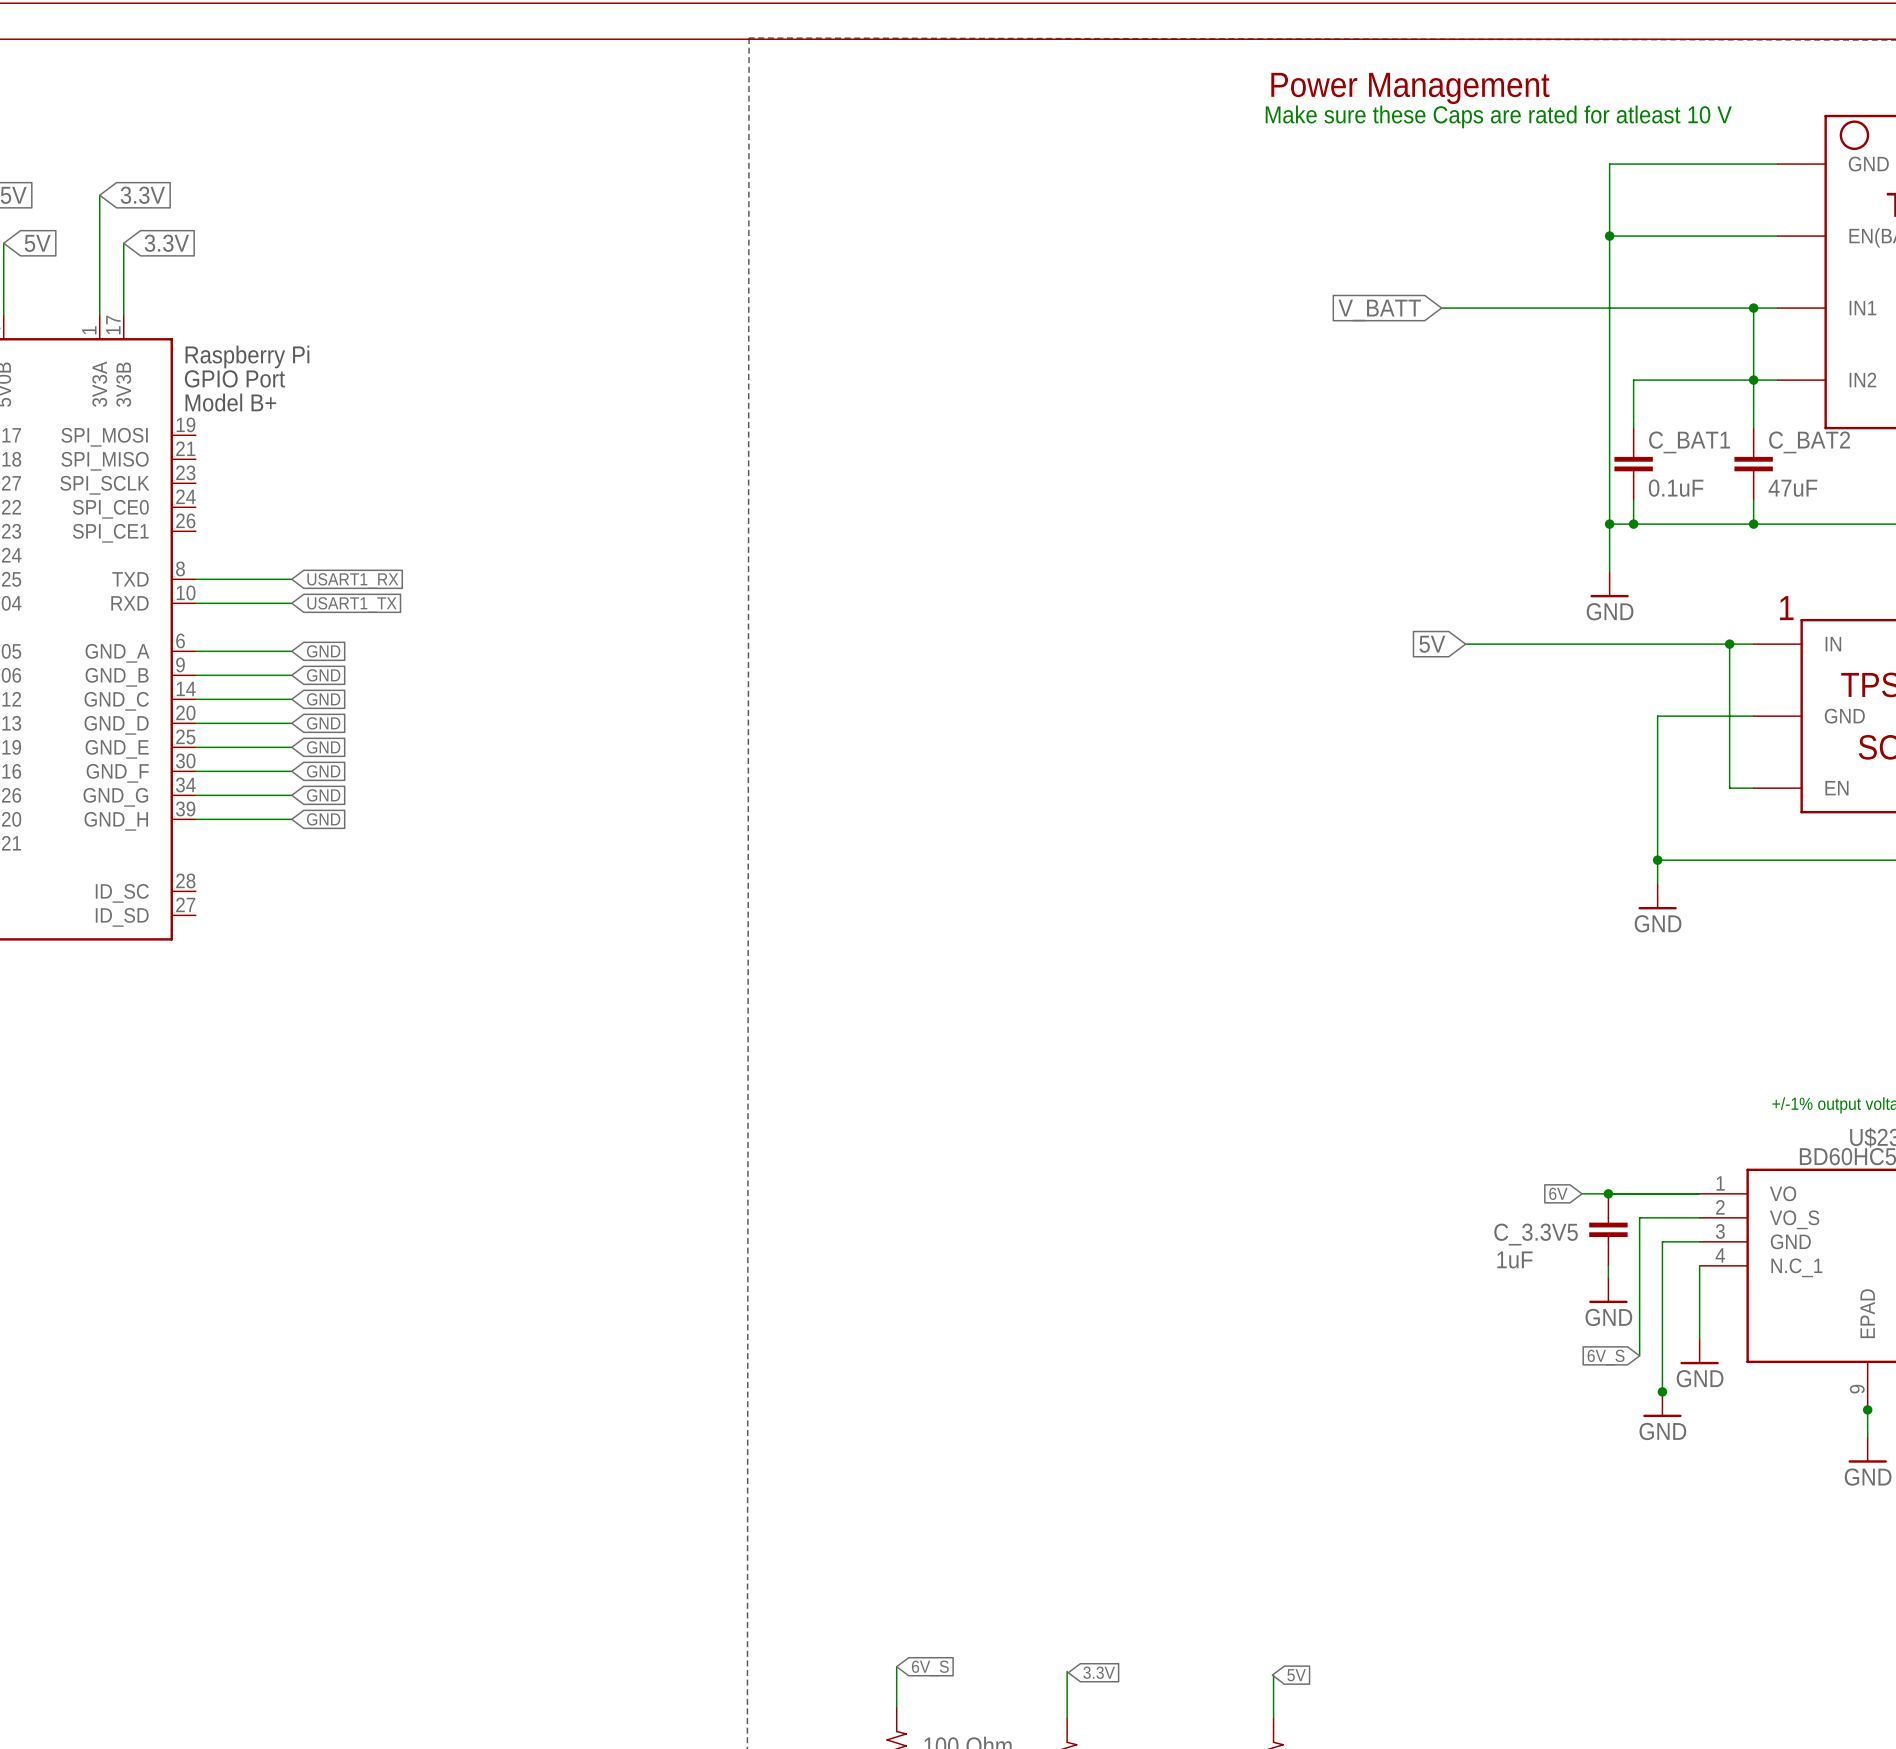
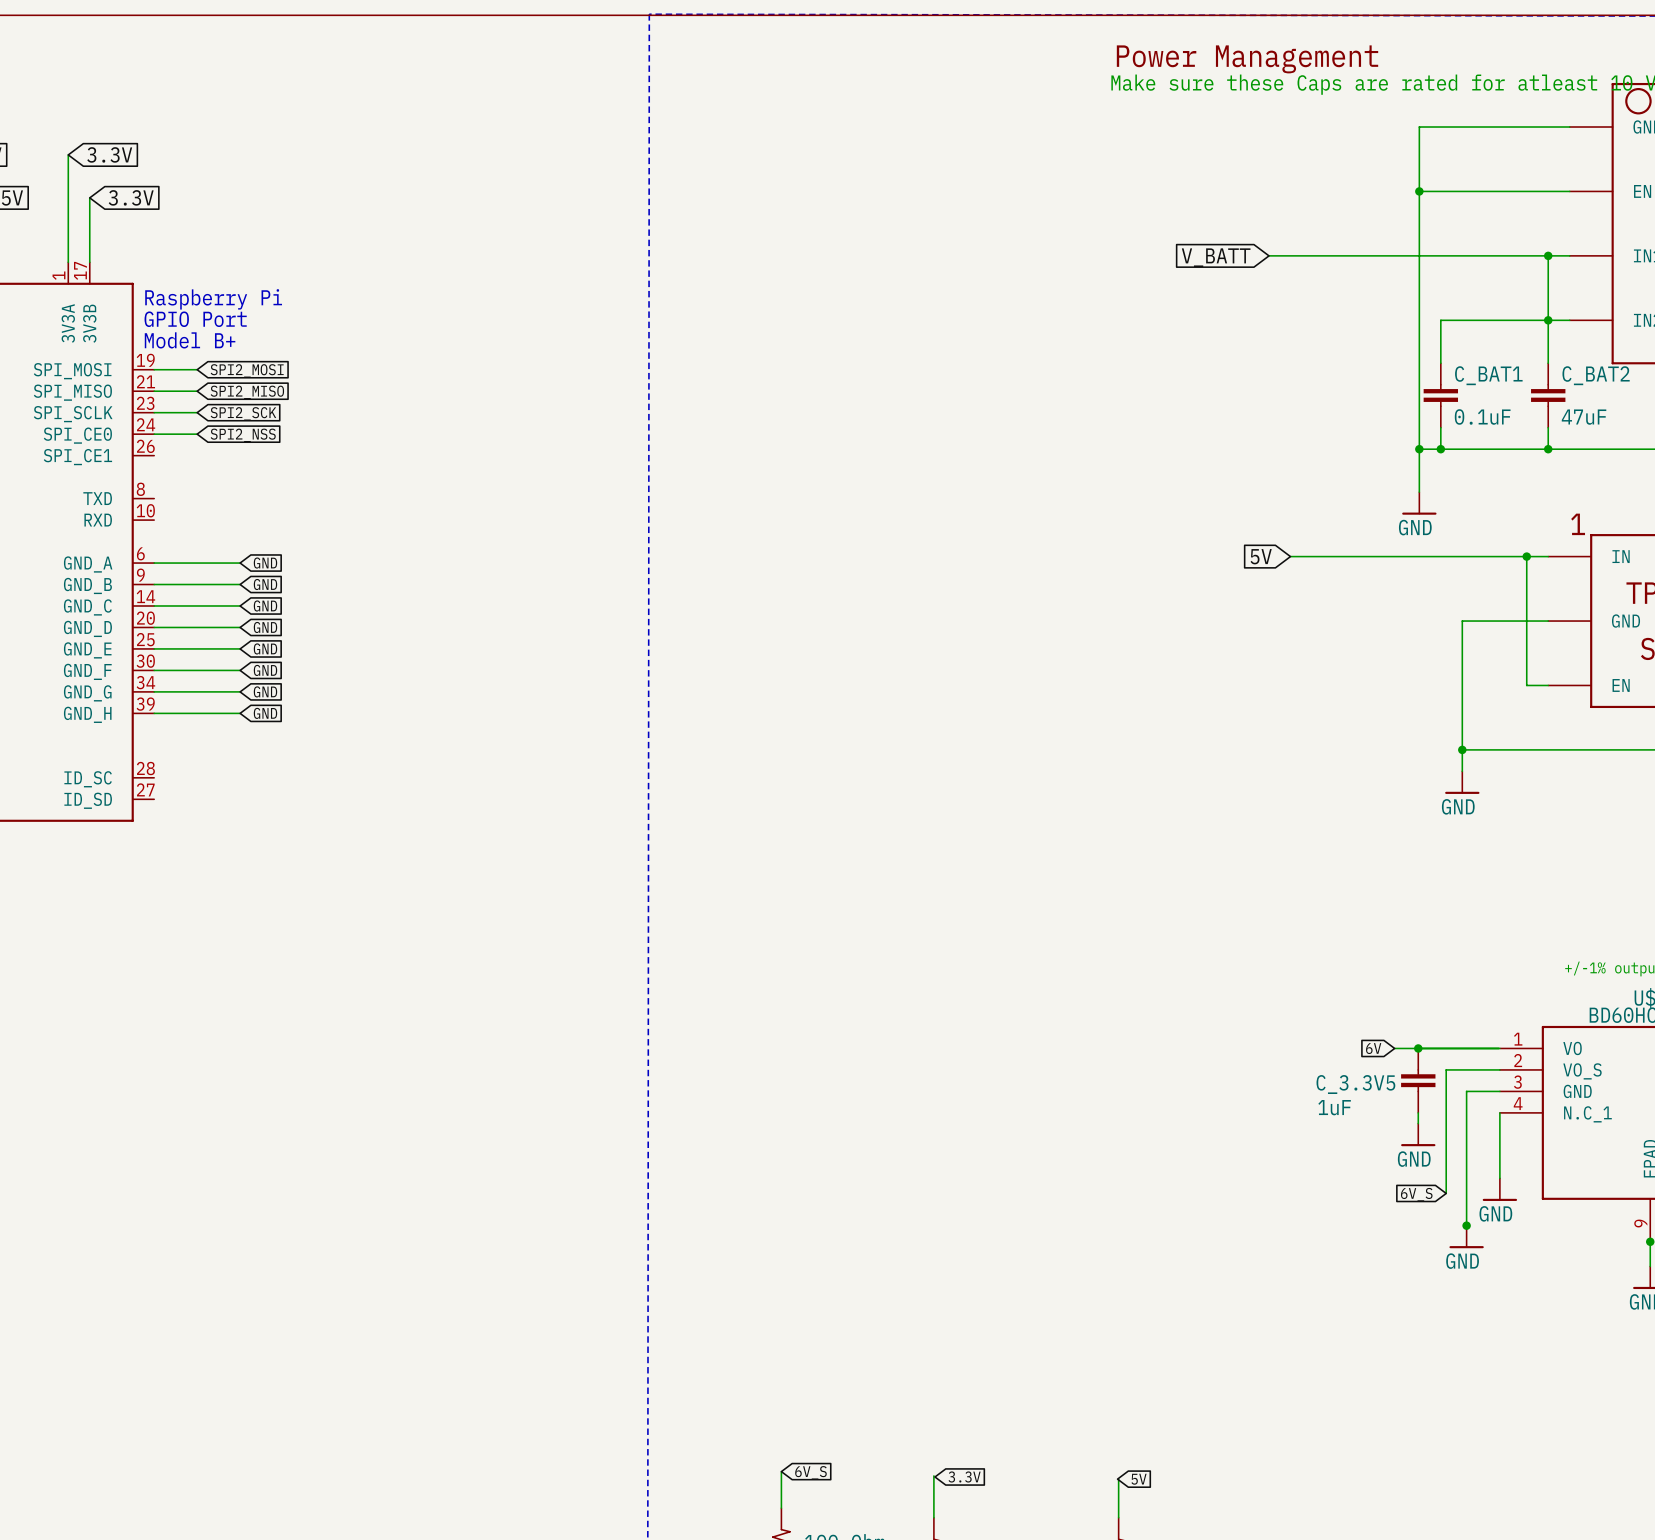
wire: none -> (154, 369) (197, 369)
global label: none -> SPI2_MOSI (247, 370)
wire: none -> (154, 391) (197, 391)
global label: none -> SPI2_MISO (247, 392)
wire: none -> (154, 412) (197, 412)
global label: none -> SPI2_SCK (243, 413)
wire: none -> (154, 434) (197, 434)
global label: none -> SPI2_NSS (243, 435)
wire: (195, 579) (291, 579) -> none
global label: USART1_RX (352, 580) -> none
wire: (195, 603) (291, 603) -> none
global label: USART1_TX (351, 604) -> none

